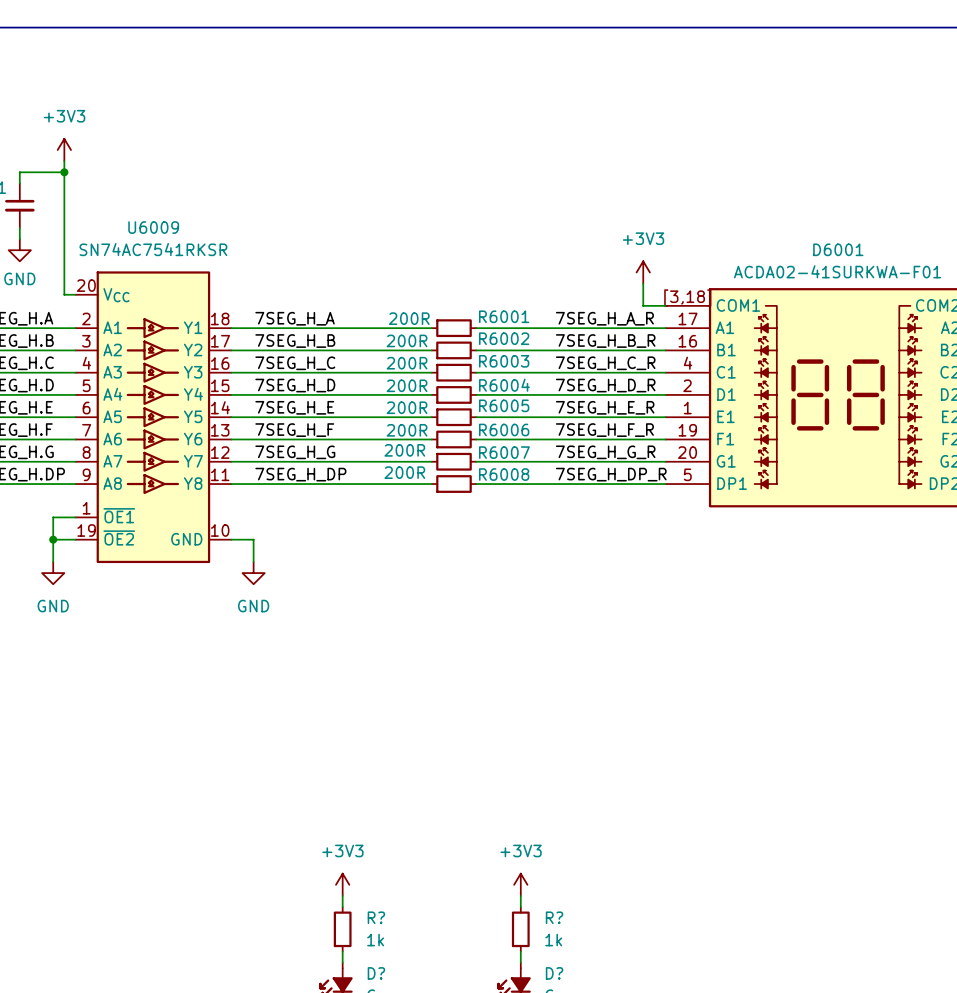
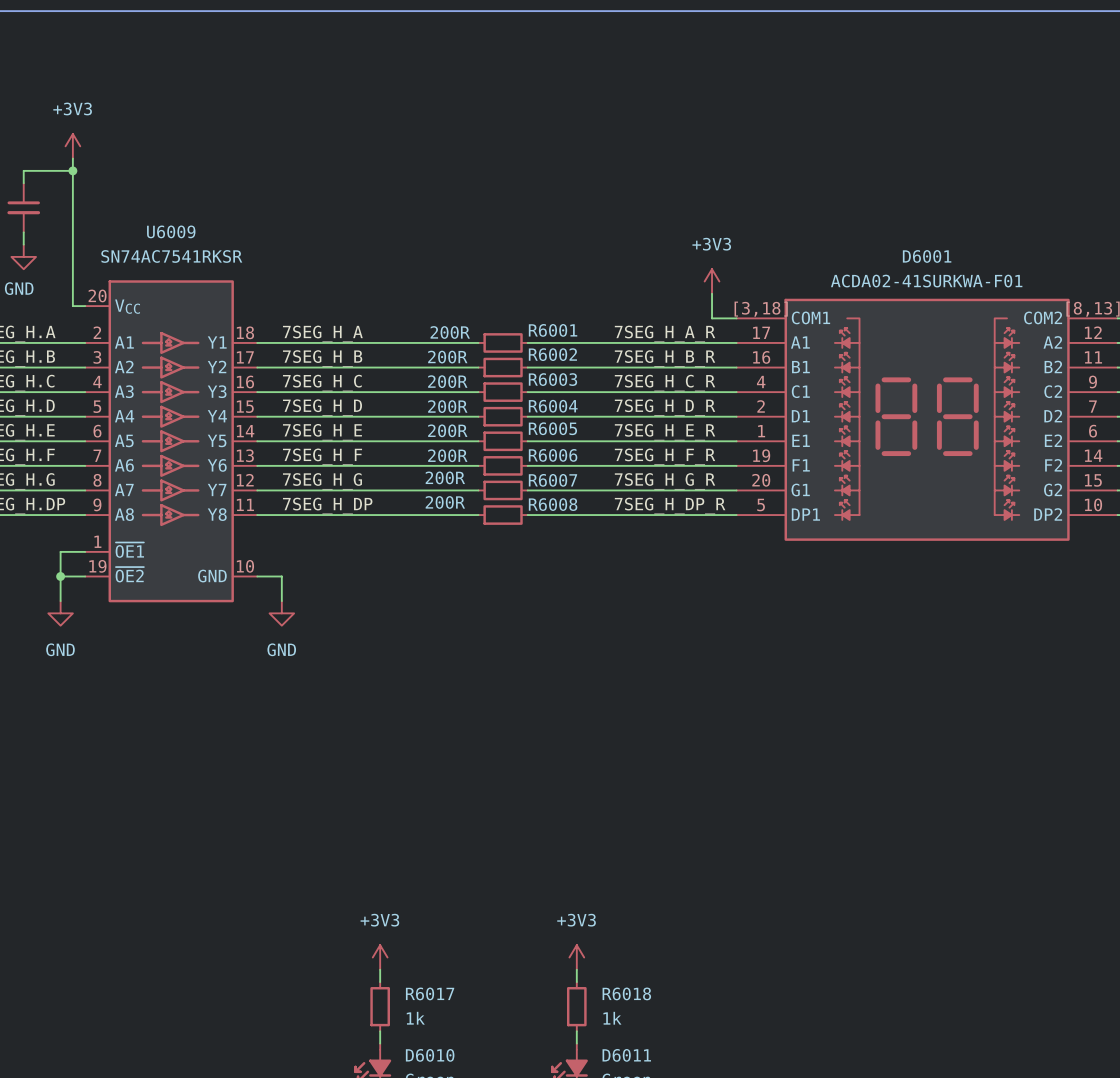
R? name: R? (376, 917) -> R6017 (430, 993)
R? name: R? (554, 917) -> R6018 (626, 993)
D? name: D? (376, 973) -> D6010 (430, 1055)
D? name: D? (554, 973) -> D6011 (626, 1055)

